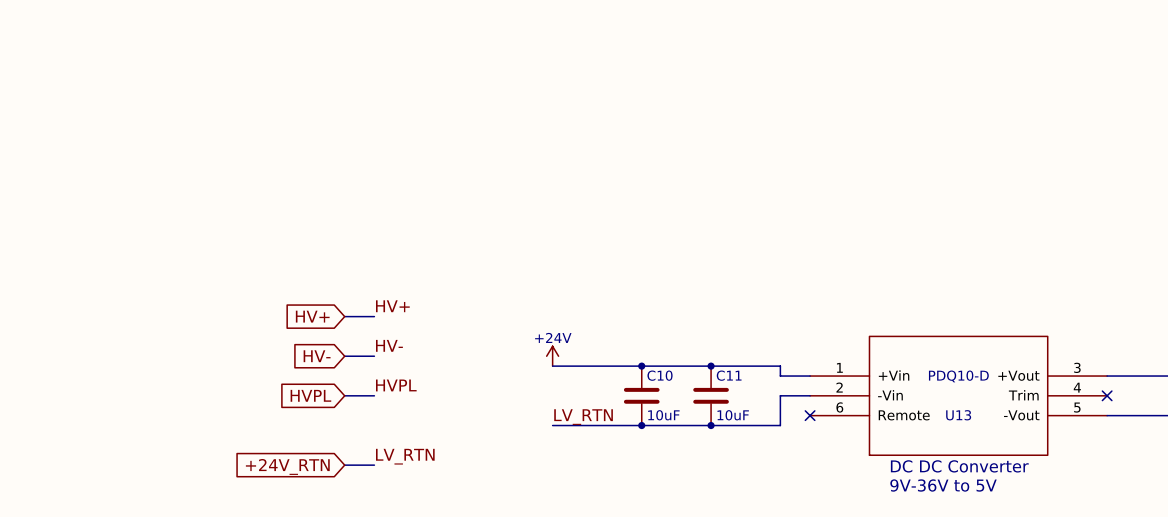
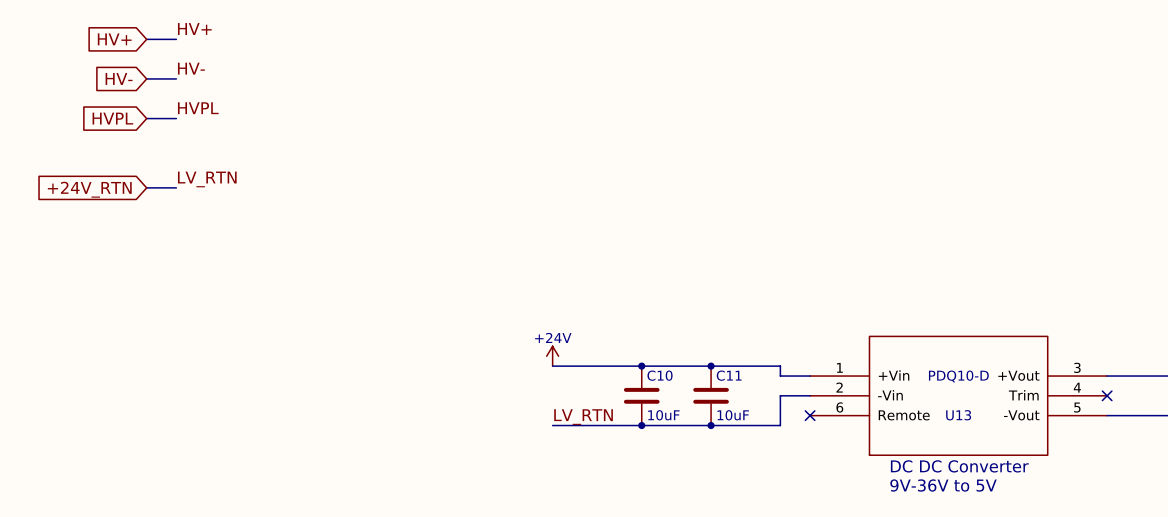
label: none -> HV+ (194, 29)
global label: none -> HV+ (114, 39)
wire: none -> (146, 39) (176, 39)
label: none -> HV- (191, 68)
global label: none -> HV- (119, 78)
wire: none -> (146, 78) (176, 78)
label: none -> HVPL (198, 108)
global label: none -> HVPL (112, 118)
wire: none -> (146, 118) (176, 118)
label: none -> LV_RTN (207, 179)
wire: none -> (146, 187) (176, 187)
global label: none -> +24V_RTN (89, 189)
label: HV+ (392, 306) -> none
global label: HV+ (312, 316) -> none
wire: (344, 316) (374, 316) -> none
label: HV- (389, 345) -> none
global label: HV- (317, 356) -> none
wire: (344, 356) (374, 356) -> none
label: HVPL (396, 385) -> none
global label: HVPL (310, 395) -> none
wire: (344, 395) (374, 395) -> none
label: LV_RTN (405, 456) -> none
wire: (344, 465) (374, 465) -> none
global label: +24V_RTN (287, 466) -> none

